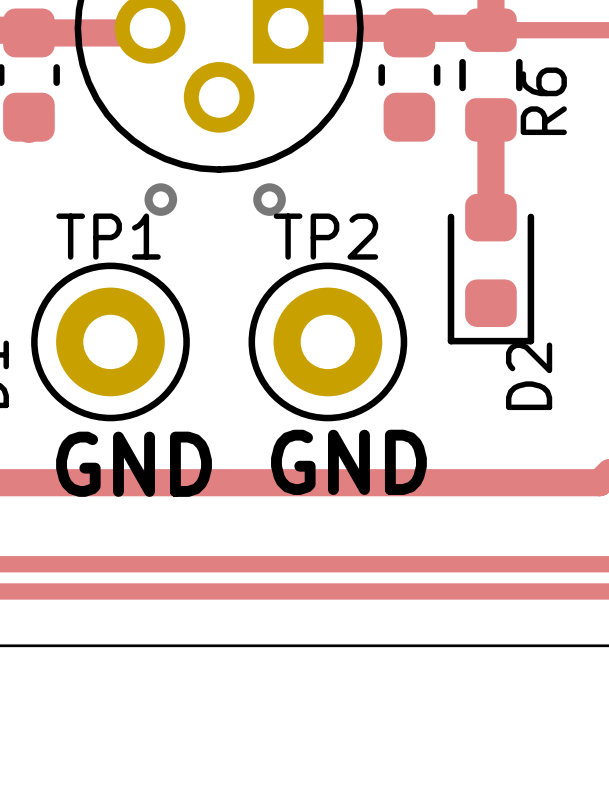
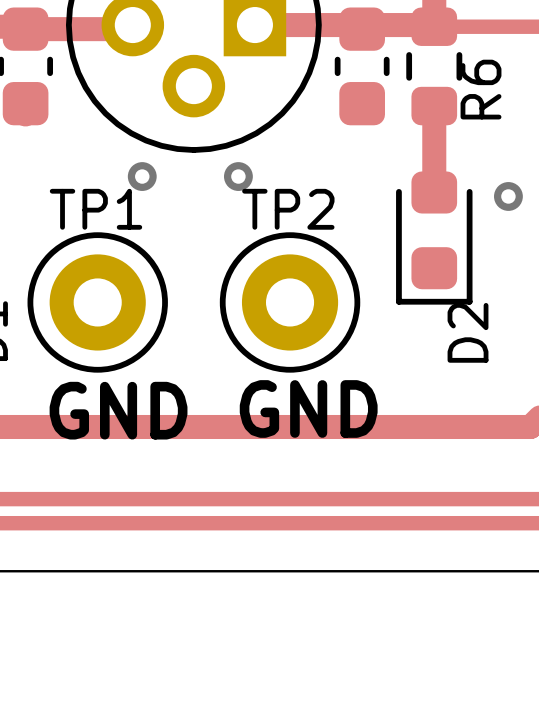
via: none -> (508, 196)

